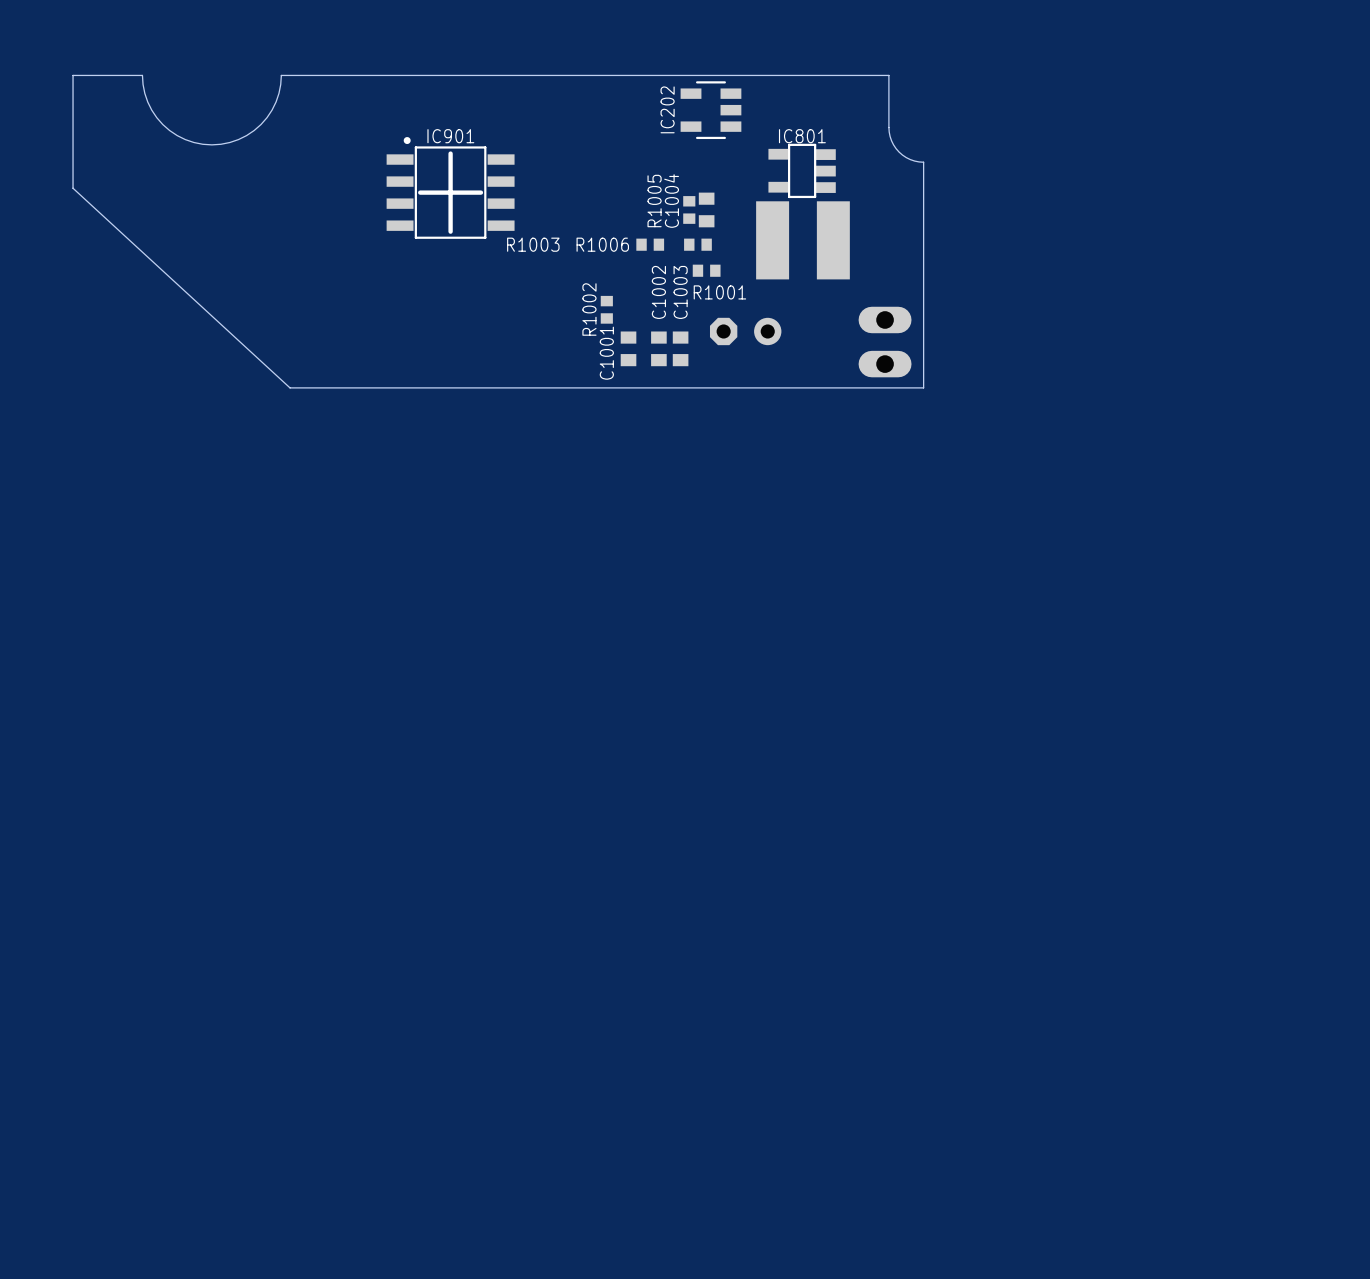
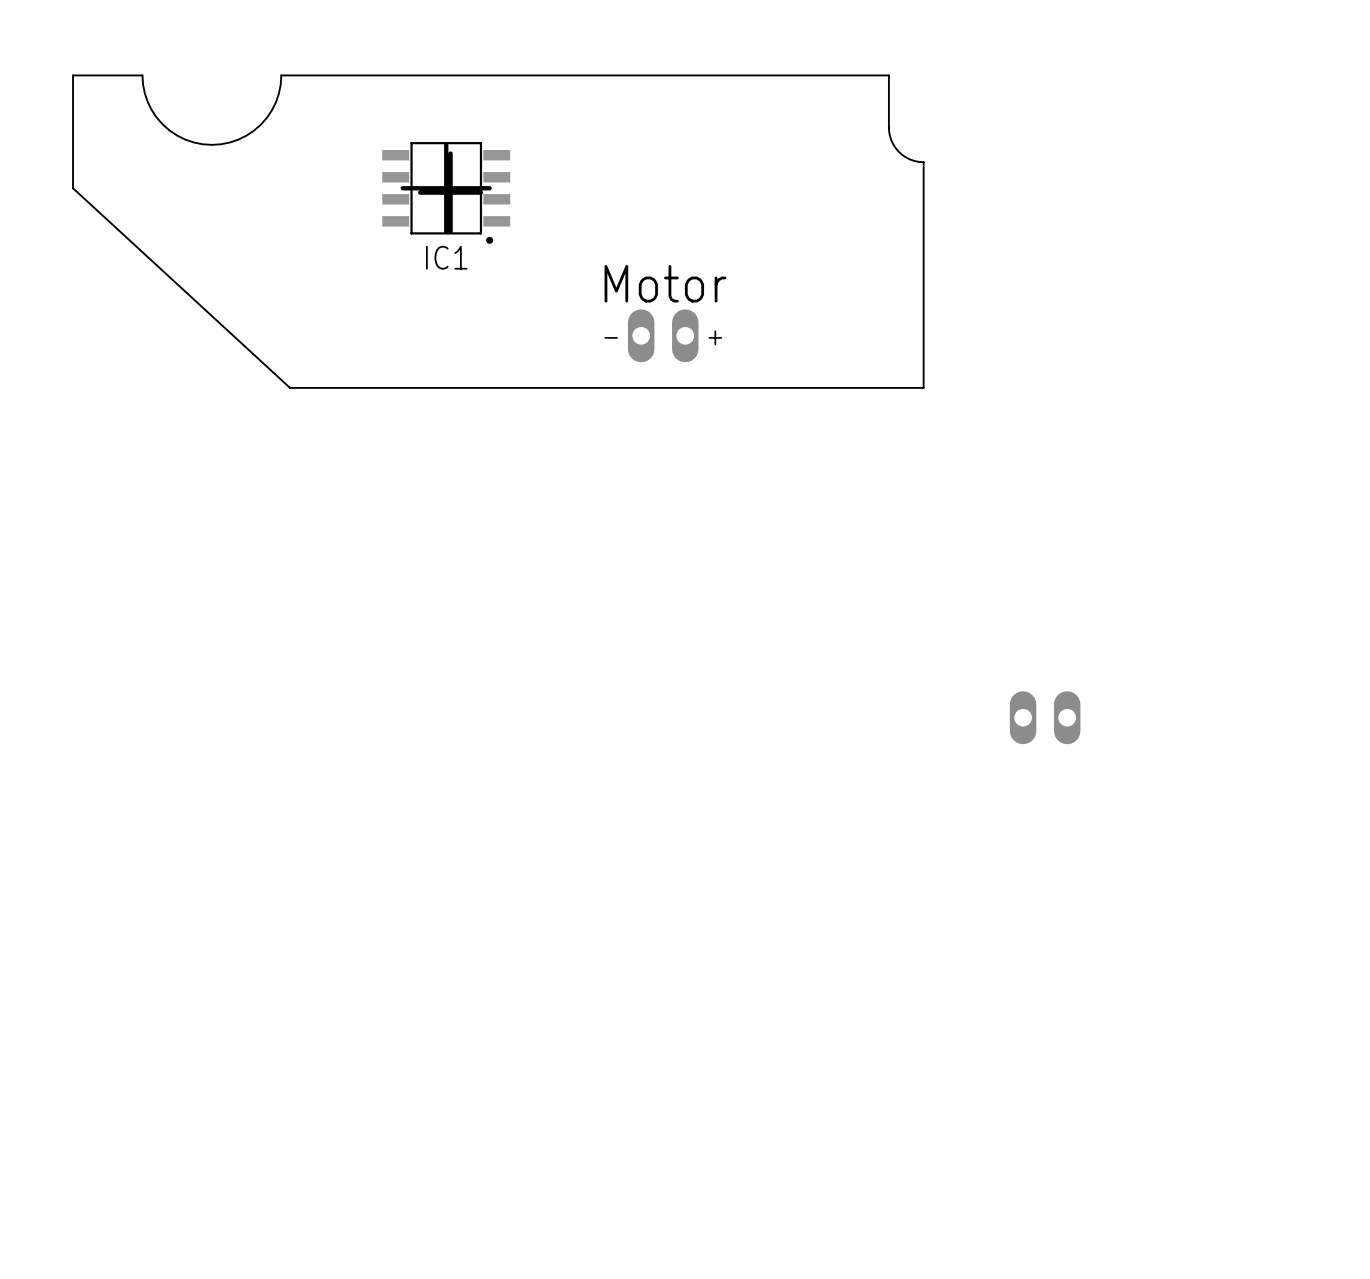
IC202: (710, 110) -> none
line: none -> (446, 144) (446, 231)
IC801: (802, 170) -> none
IC901: (450, 187) -> none
line: none -> (489, 188) (402, 188)
IC1: none -> (446, 192)
R1005: (689, 209) -> none
C1004: (706, 209) -> none
part: (802, 240) -> none
R1003: (650, 244) -> none
R1006: (697, 244) -> none
R1001: (706, 270) -> none
text: none -> Motor (665, 283)
R1002: (606, 309) -> none
part: (745, 331) -> none
part: none -> (663, 335)
text: none -> - (611, 337)
text: none -> + (715, 337)
part: (885, 342) -> none
C1001: (628, 348) -> none
C1002: (658, 348) -> none
C1003: (680, 348) -> none
part: none -> (1045, 717)

